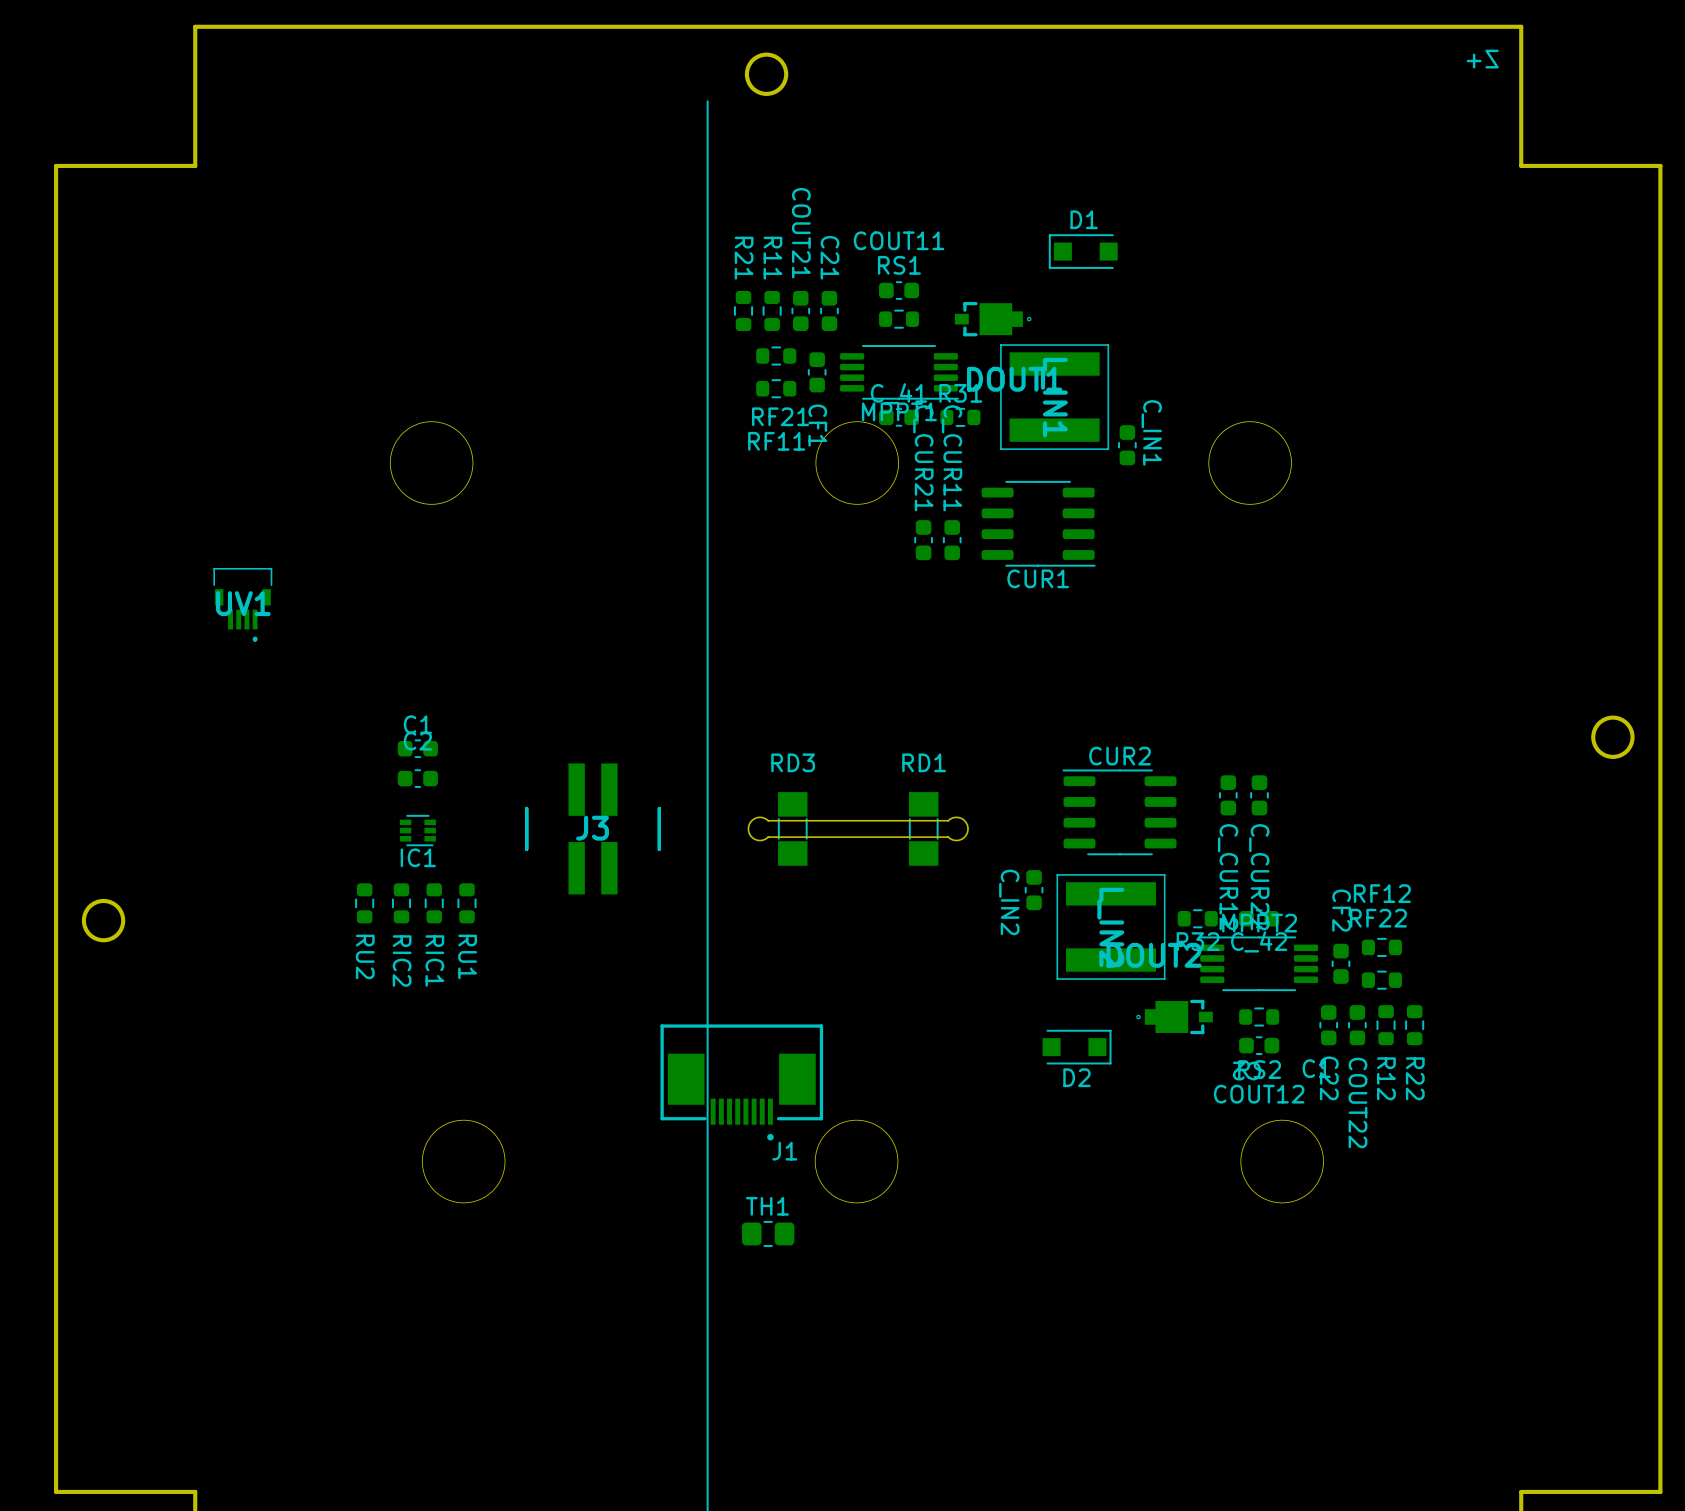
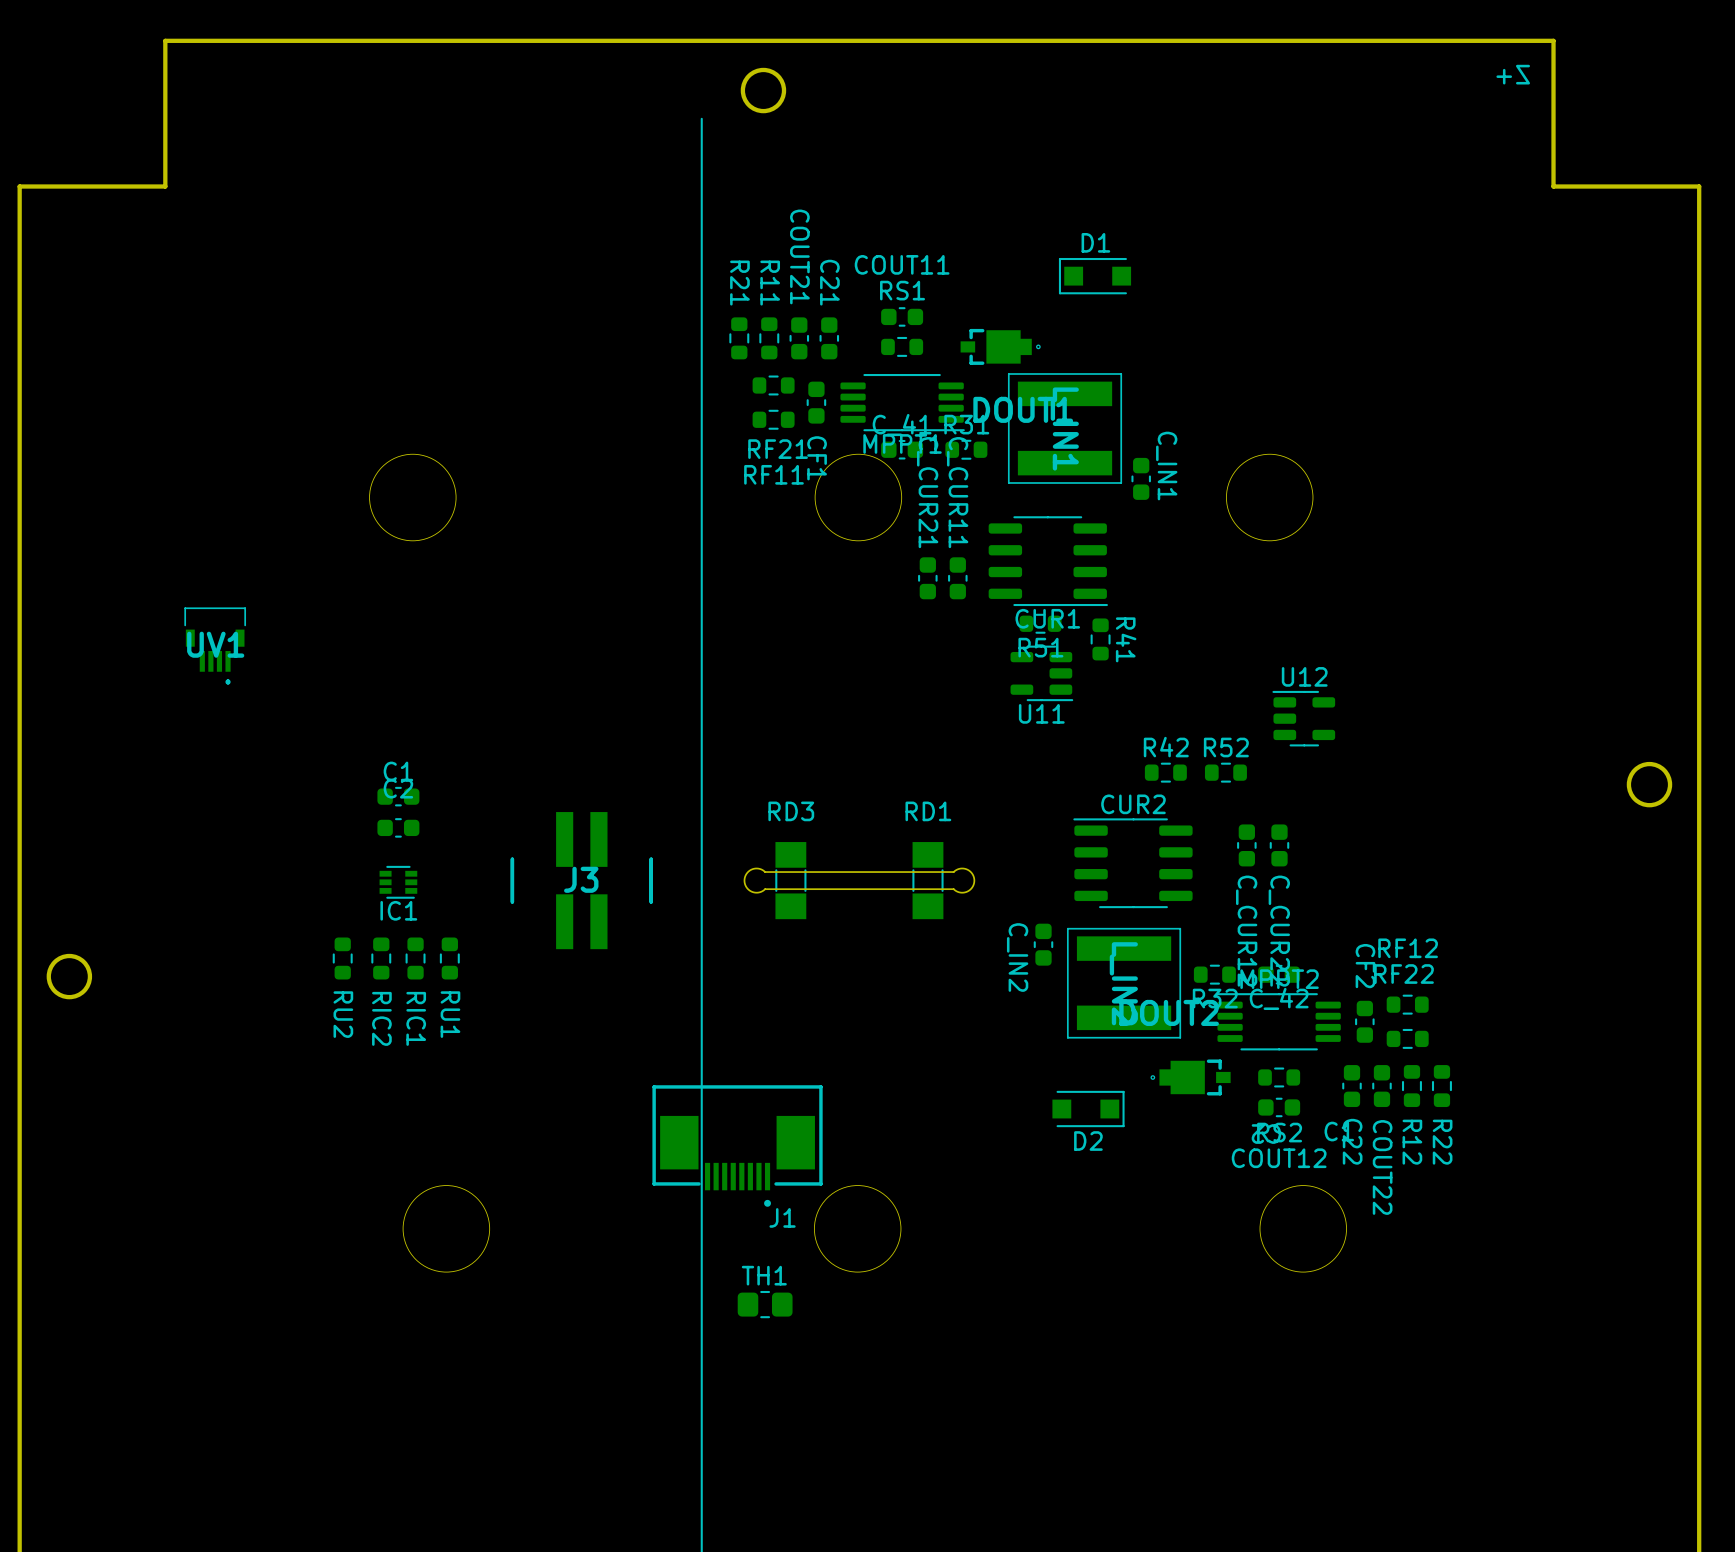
R51: none -> (1040, 623)
R41: none -> (1100, 639)
U11: none -> (1041, 673)
U12: none -> (1303, 718)
R42: none -> (1165, 772)
R52: none -> (1225, 772)

